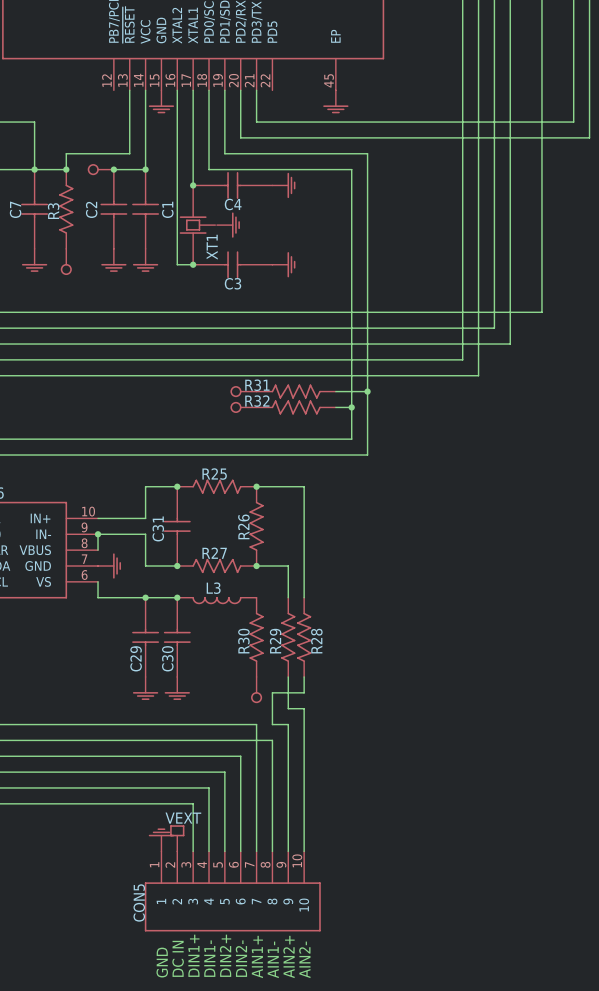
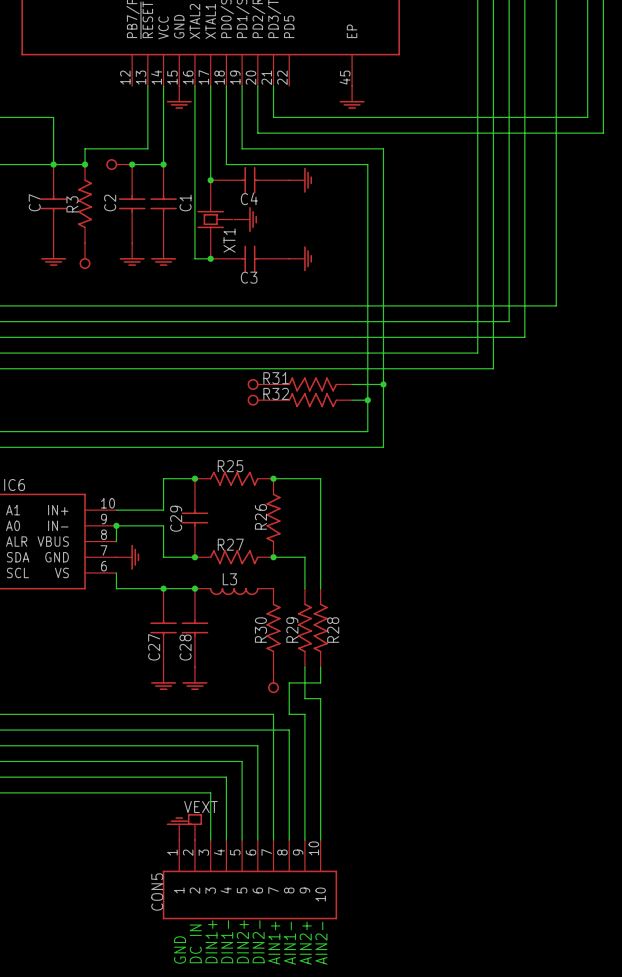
C31 name: C31 (158, 528) -> C29 (176, 518)
C29 name: C29 (136, 658) -> C27 (154, 647)
C30 name: C30 (167, 658) -> C28 (185, 647)

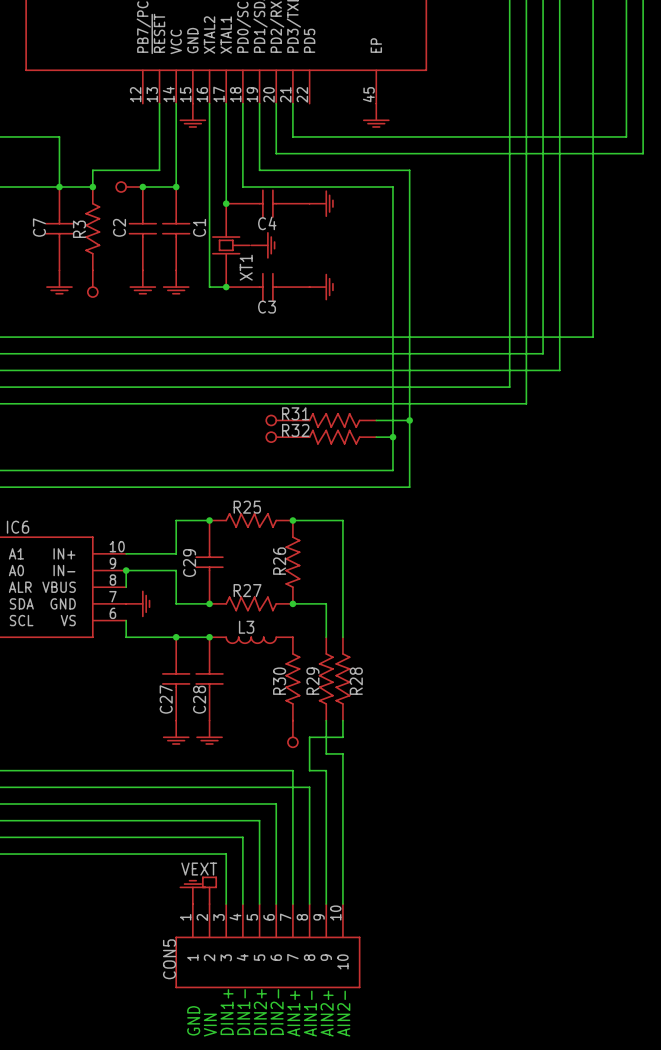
power symbol text: none -> VEXT (199, 869)
power symbol text: VEXT (200, 807) -> none
text: DC IN (195, 943) -> VIN (210, 1025)

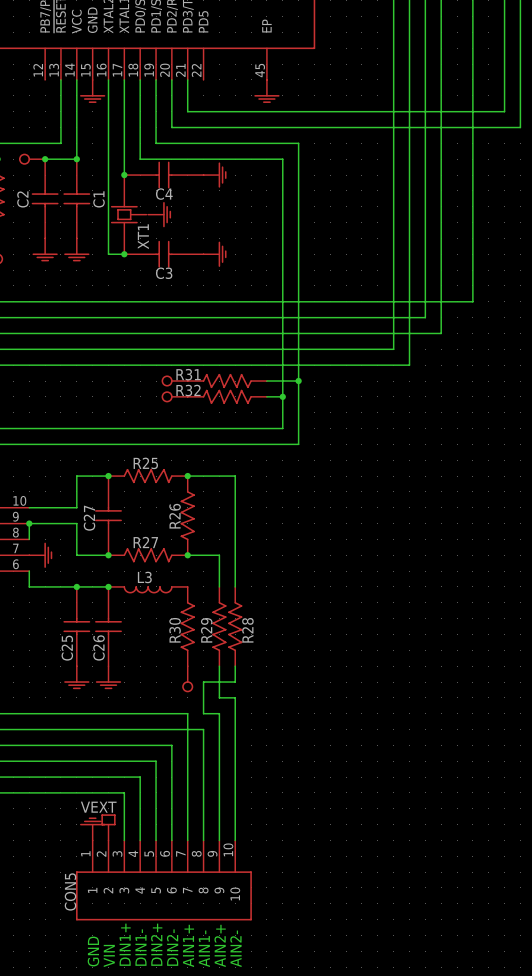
C29 name: C29 (189, 563) -> C27 (89, 518)
C27 name: C27 (166, 699) -> C25 (67, 648)
C28 name: C28 (199, 699) -> C26 (99, 647)

